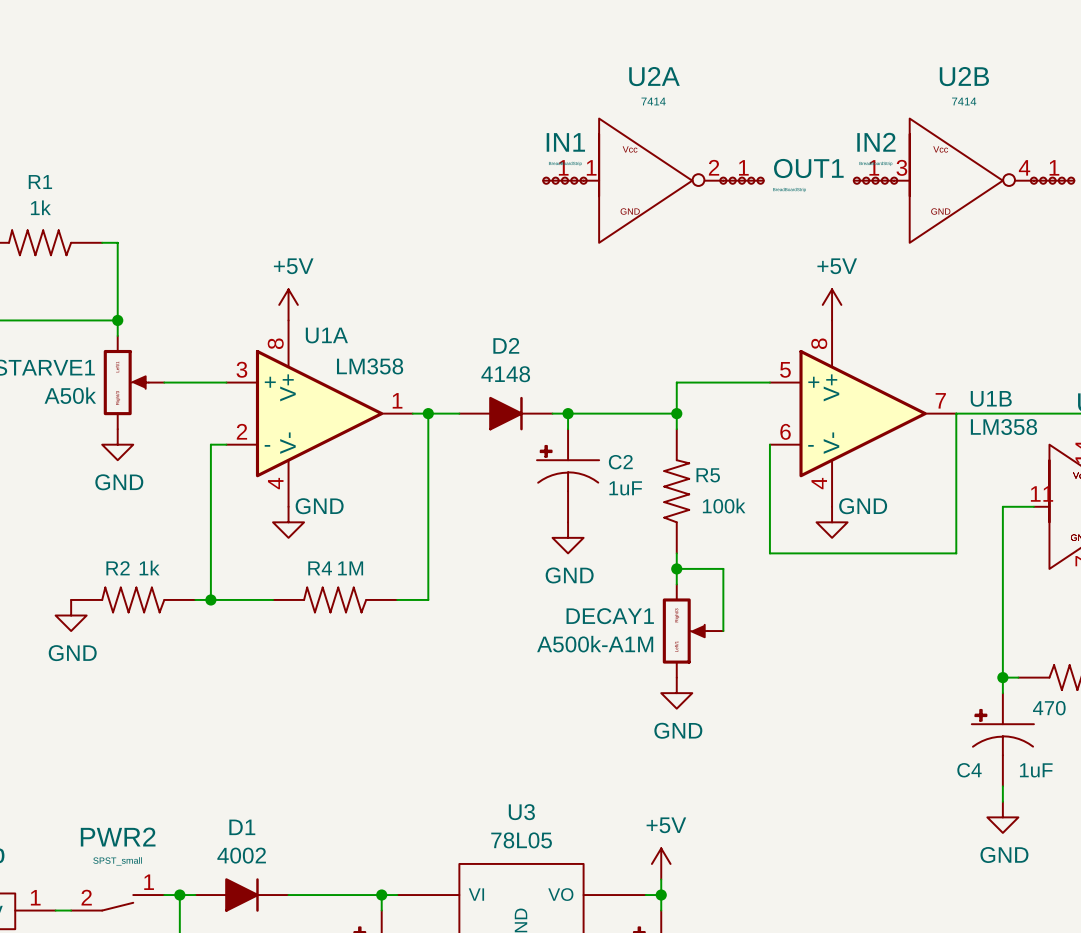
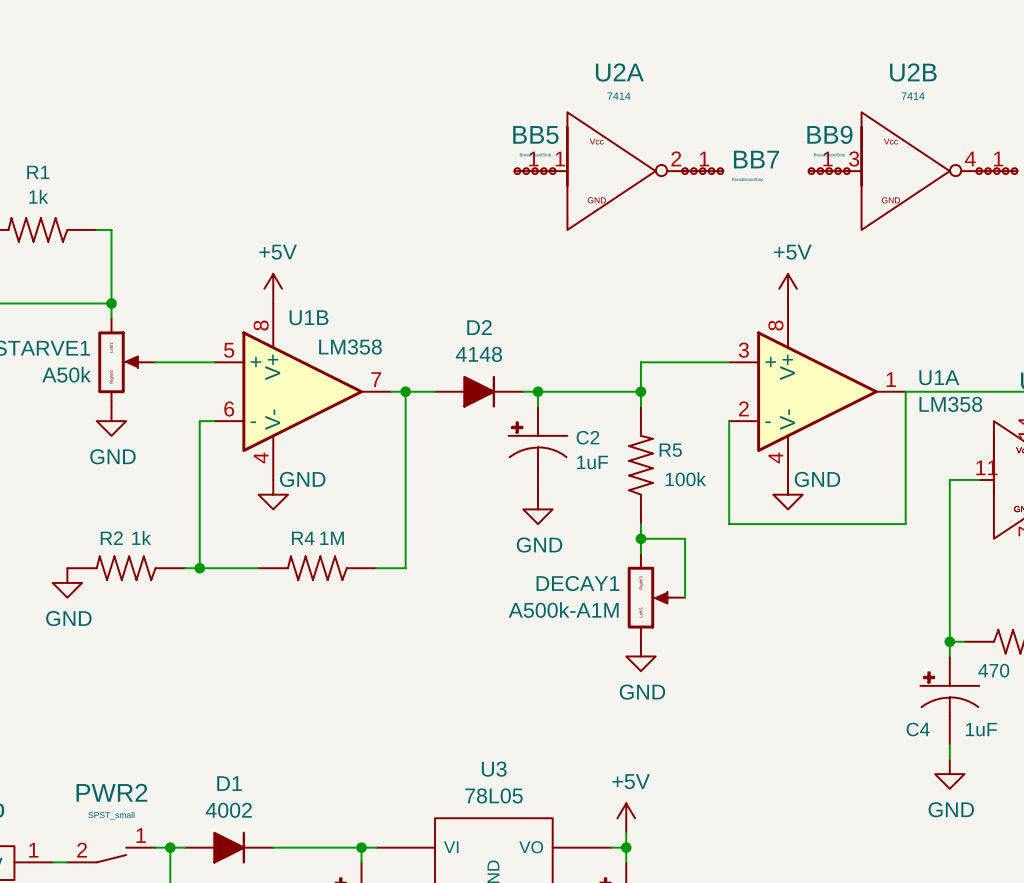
IN1 name: IN1 (565, 142) -> BB5 (535, 135)
IN2 name: IN2 (876, 142) -> BB9 (829, 134)
OUT1 name: OUT1 (808, 168) -> BB7 (756, 159)
U1A name position: U1A (326, 335) -> U1A (939, 377)
U1B name position: U1B (991, 398) -> U1B (309, 317)
U1A position: (319, 413) -> (817, 391)
U1B position: (863, 413) -> (302, 391)

